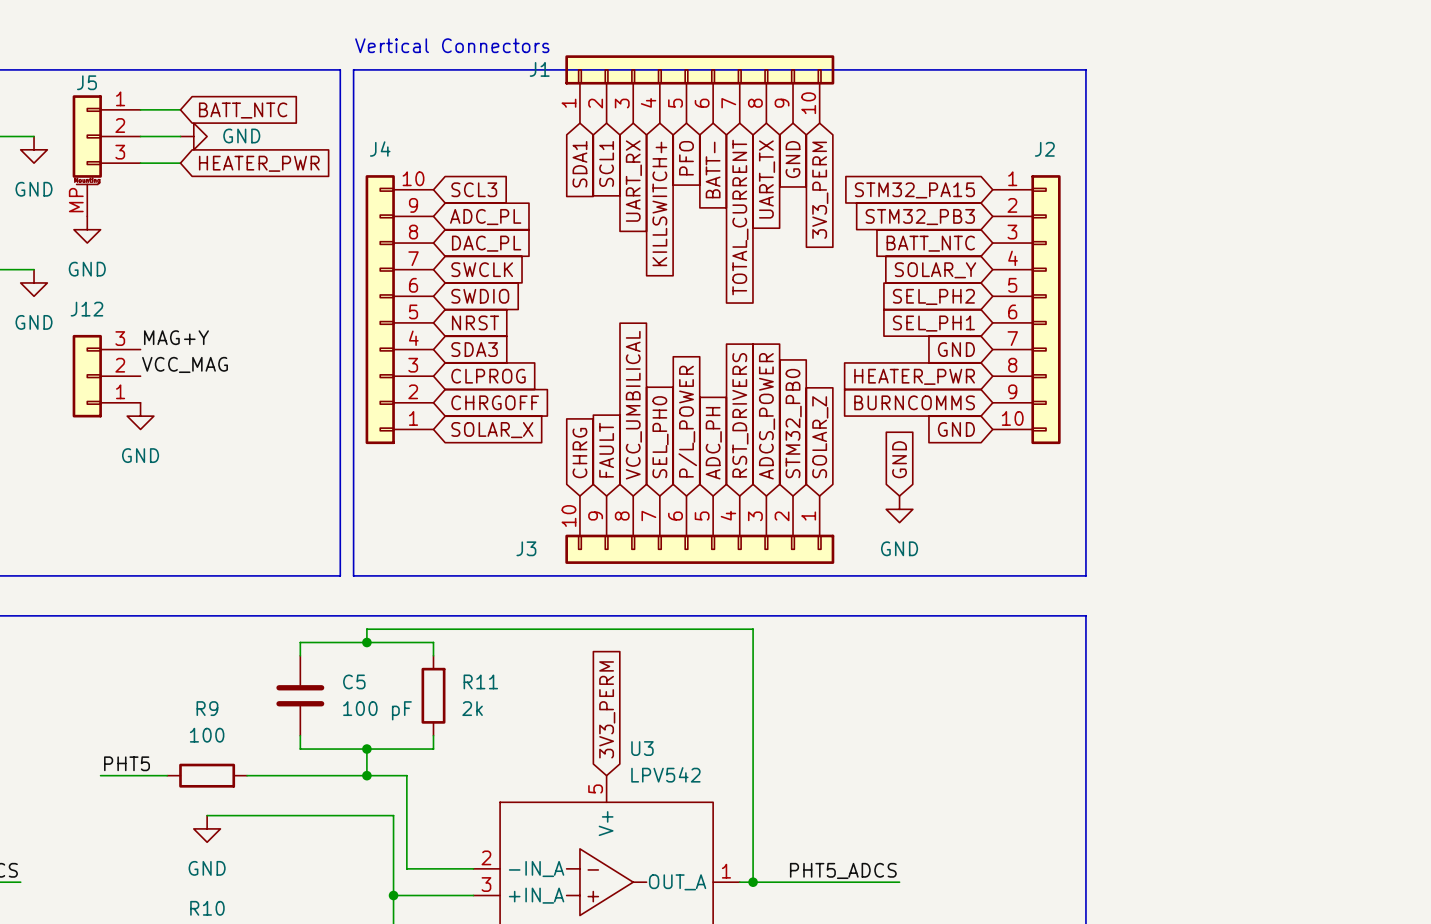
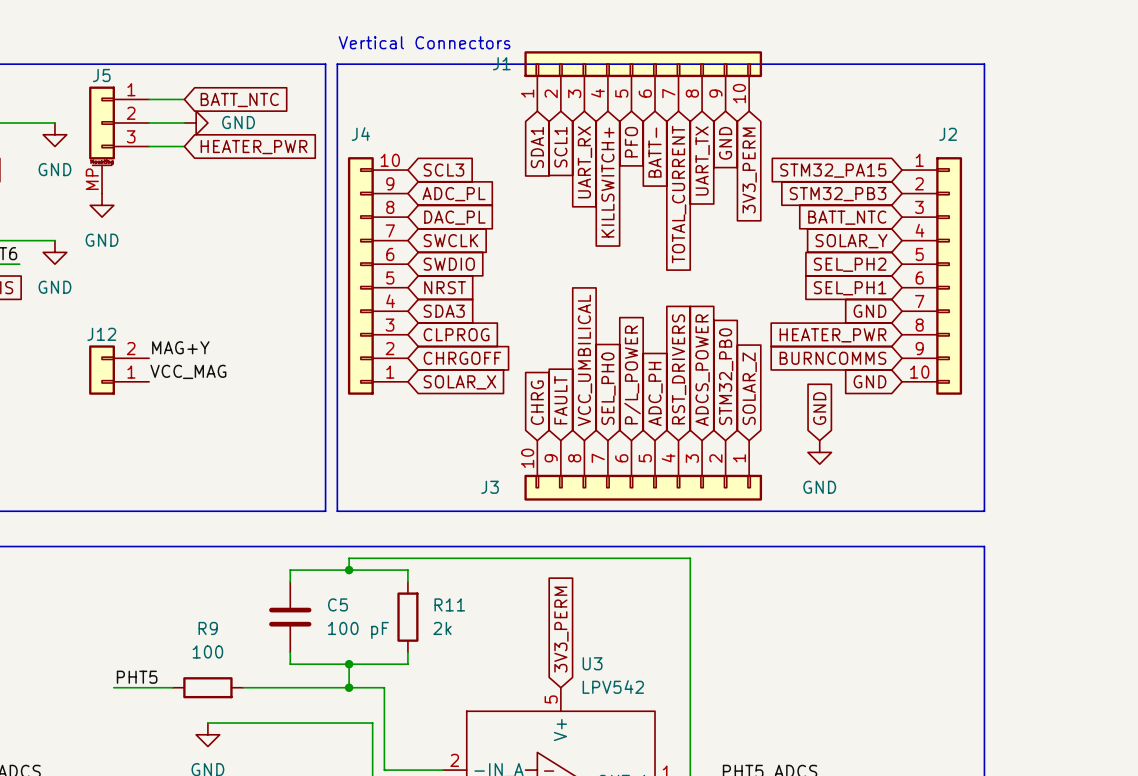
J12 name position: J12 (86, 309) -> J12 (101, 334)
J12 symbol: [72, 334, 141, 418] -> [89, 345, 150, 395]
label position: MAG+Y (176, 337) -> MAG+Y (180, 347)
label position: VCC_MAG (185, 364) -> VCC_MAG (188, 371)
power symbol: GND (140, 416) -> none

